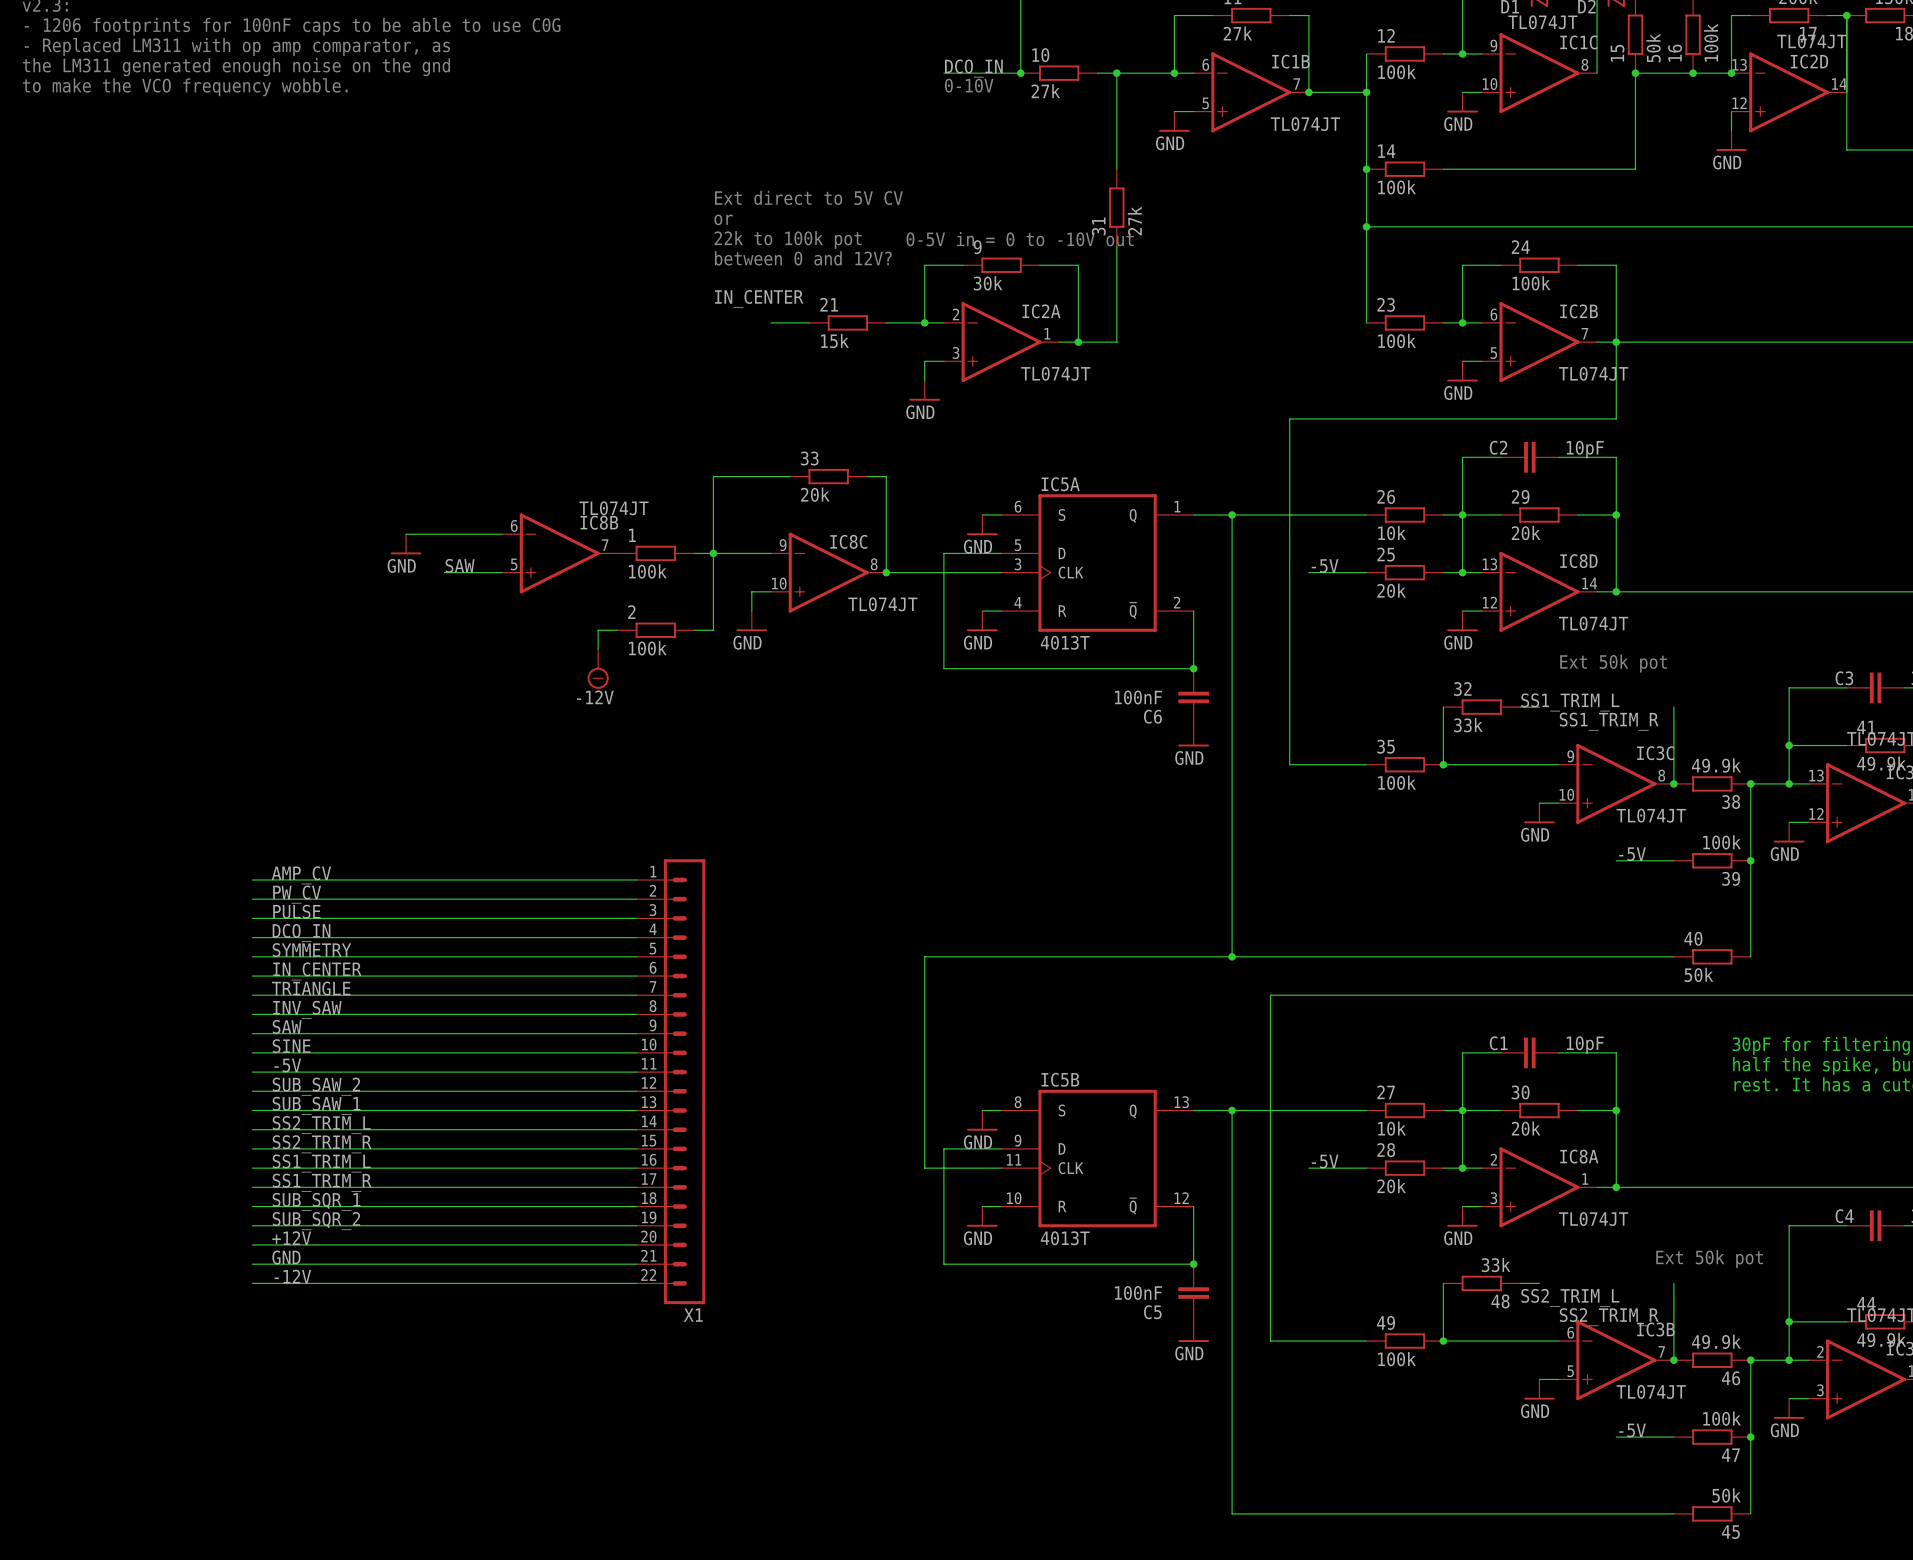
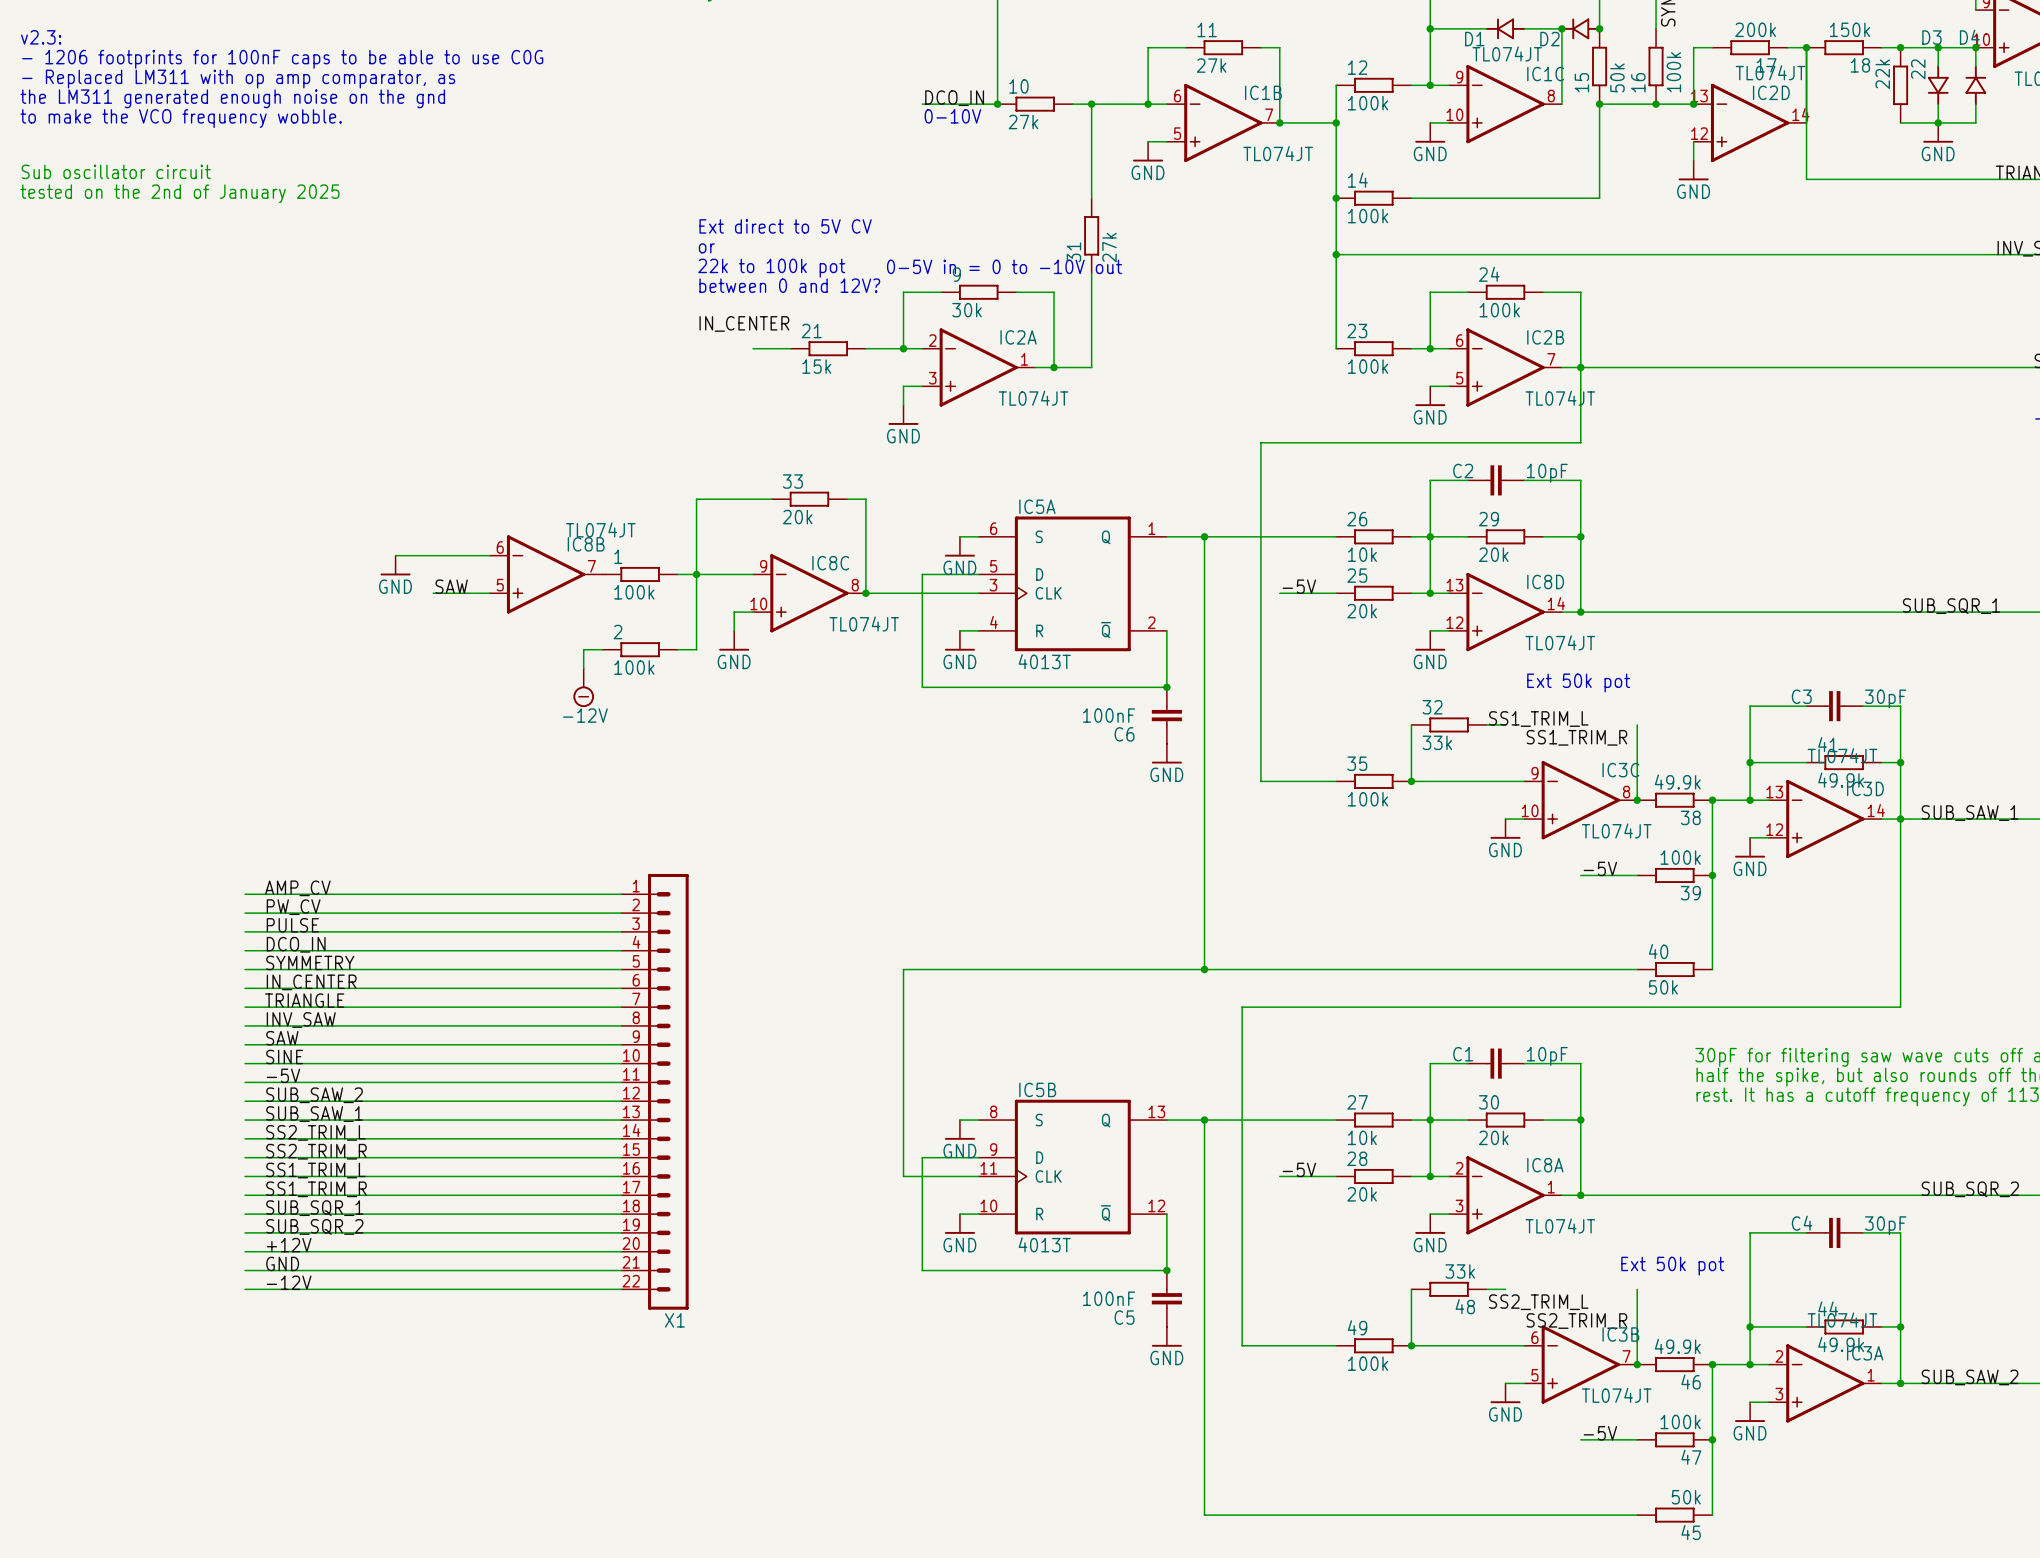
text: none -> Sub oscillator circuit (116, 171)
text: none -> tested on the 2nd of January 2025 (180, 193)

